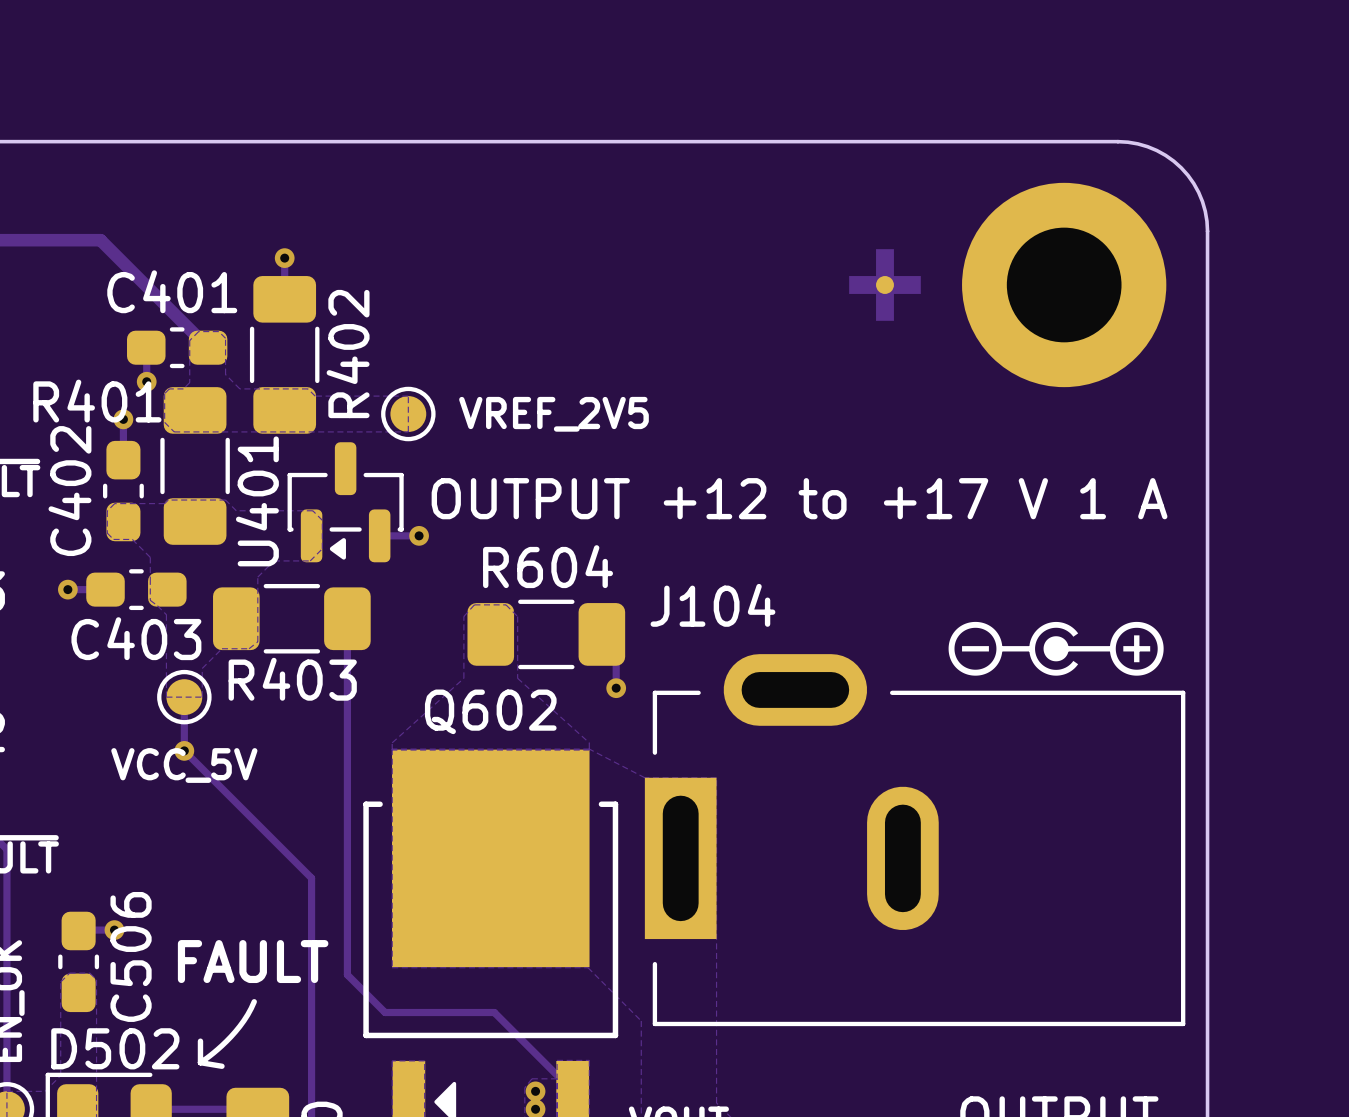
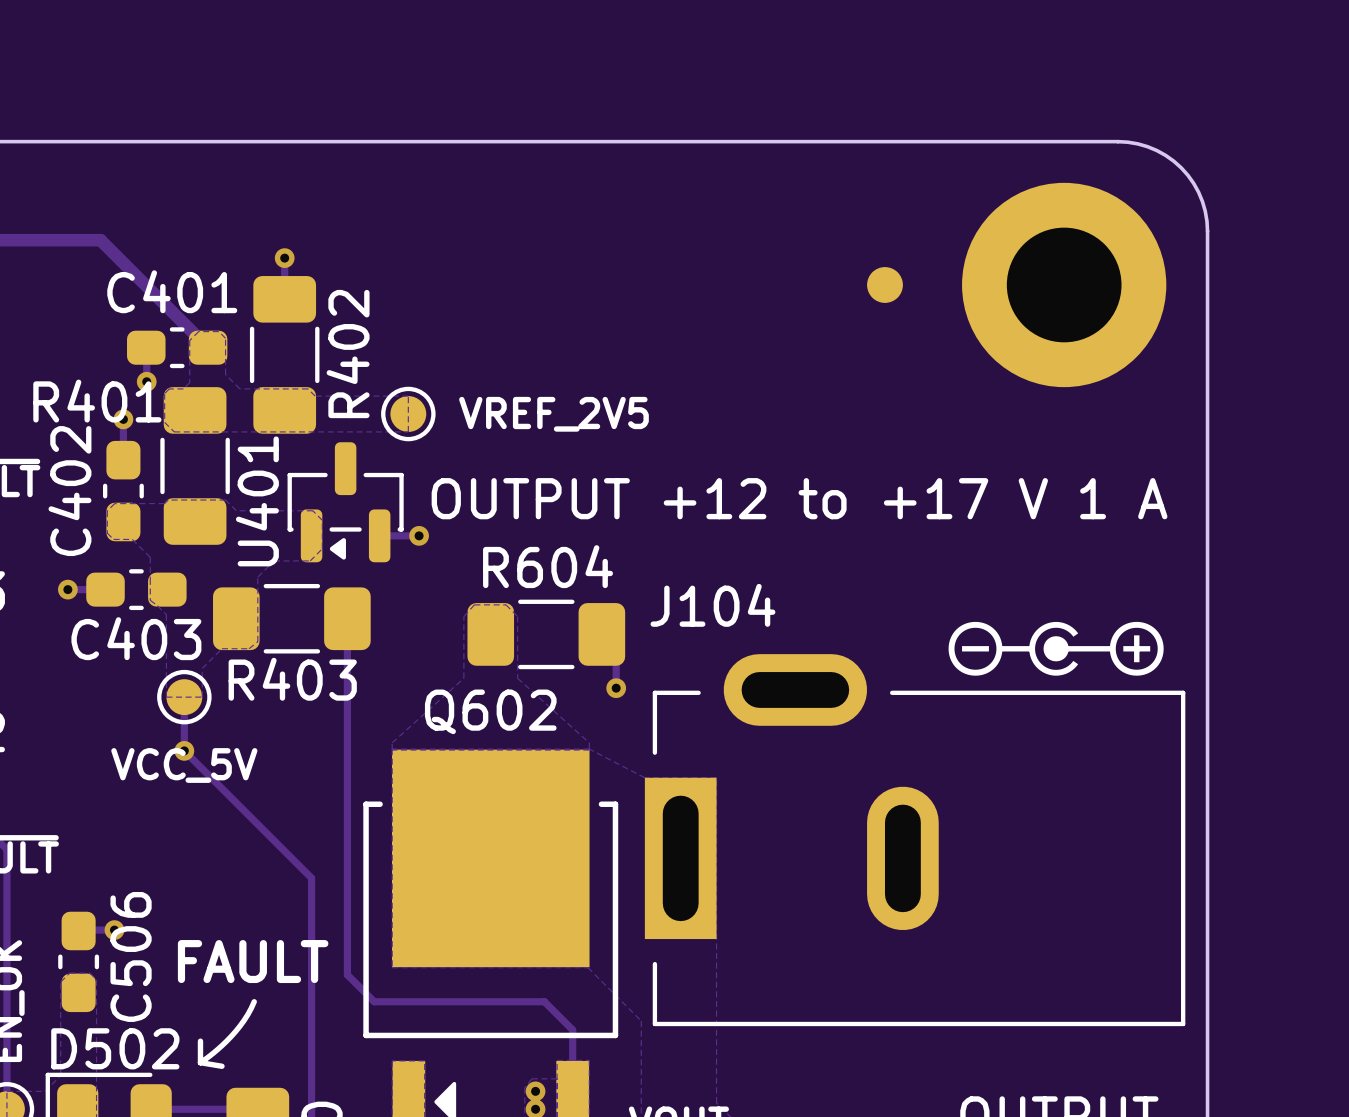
part footprint: [849, 249, 921, 321] -> [867, 267, 903, 303]
track: (374, 1001) (385, 1012) (494, 1012) (572, 1090) -> (374, 1001) (544, 1001) (572, 1029) (572, 1090)

